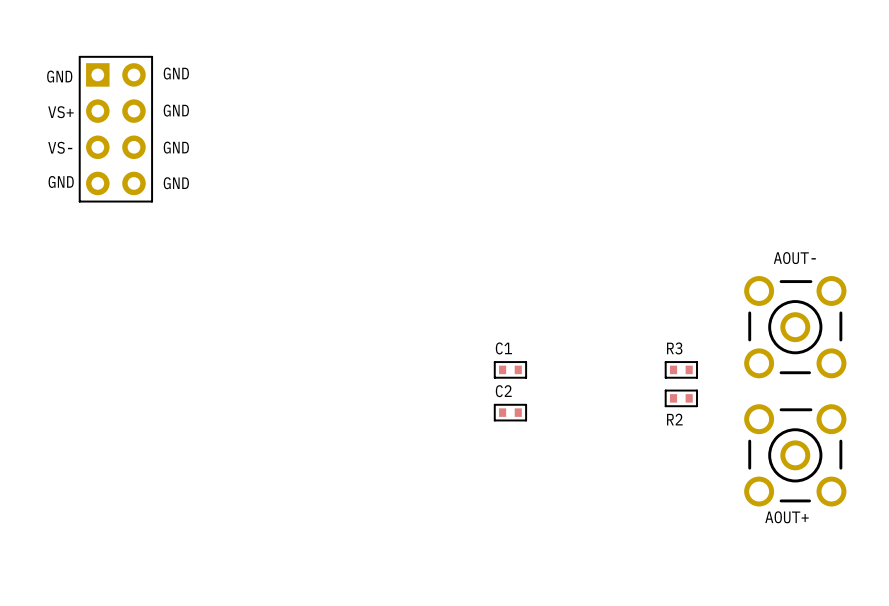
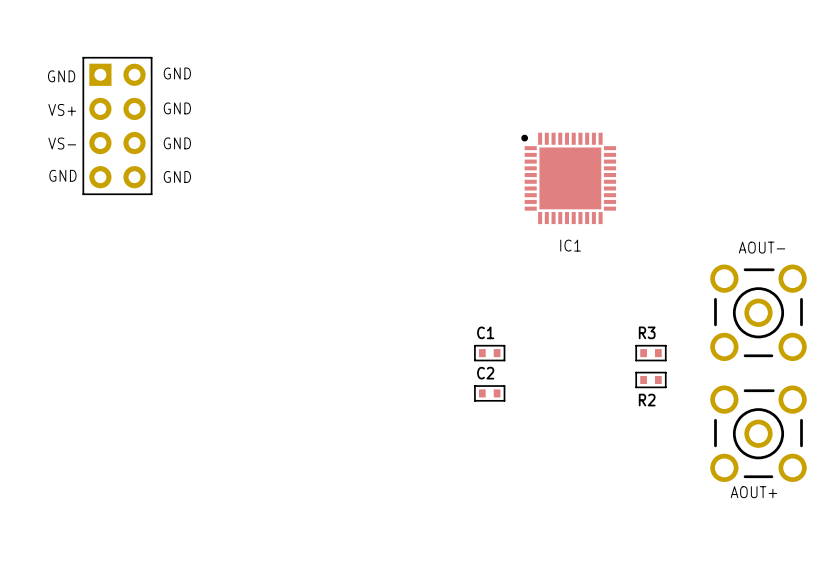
IC1: none -> (568, 178)

